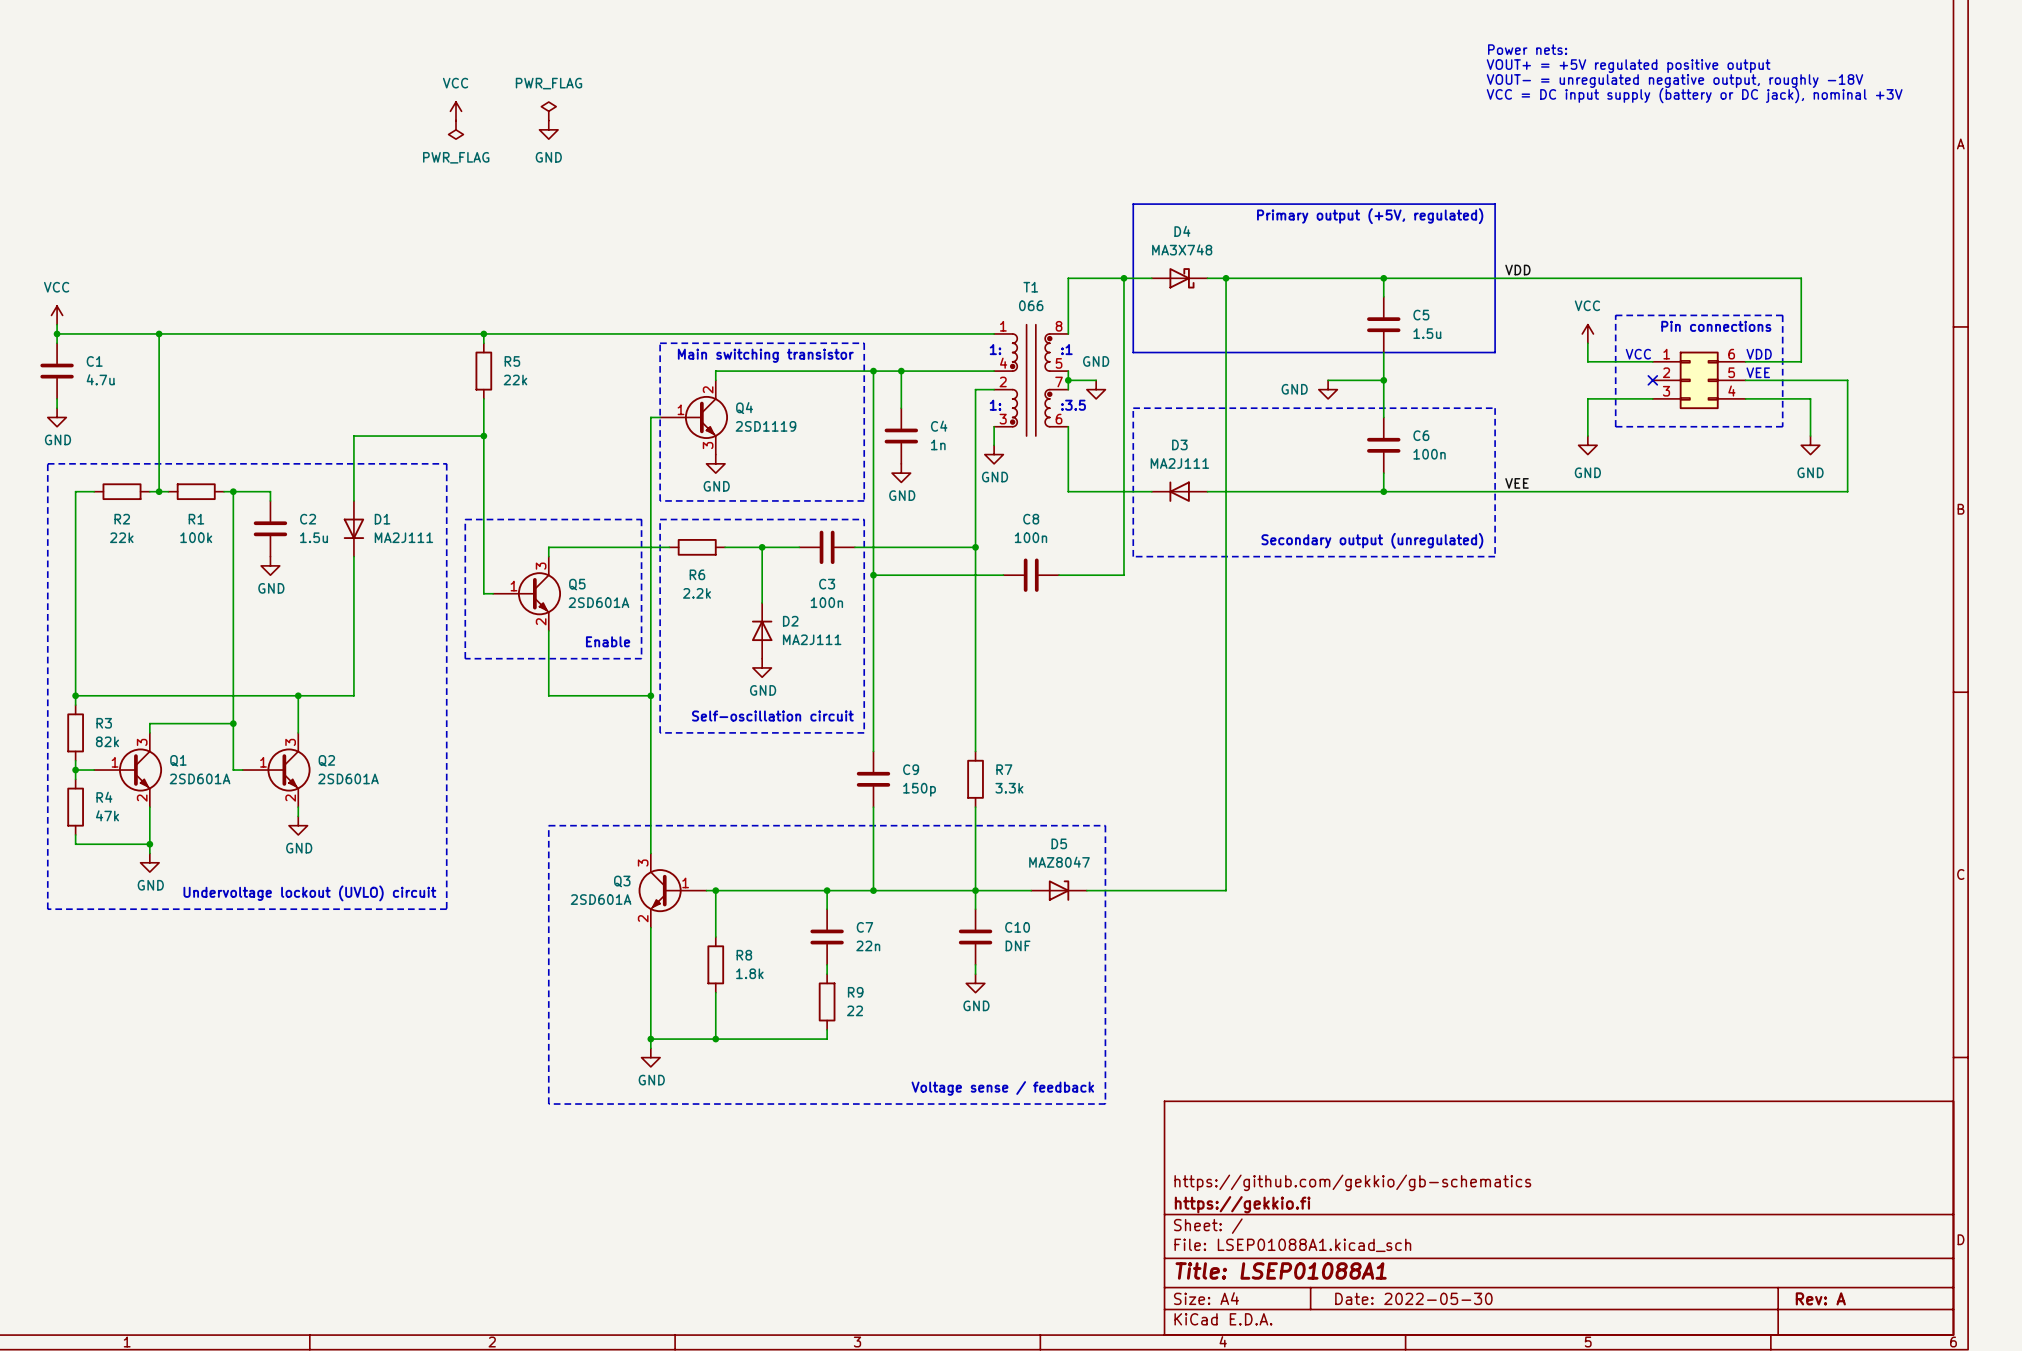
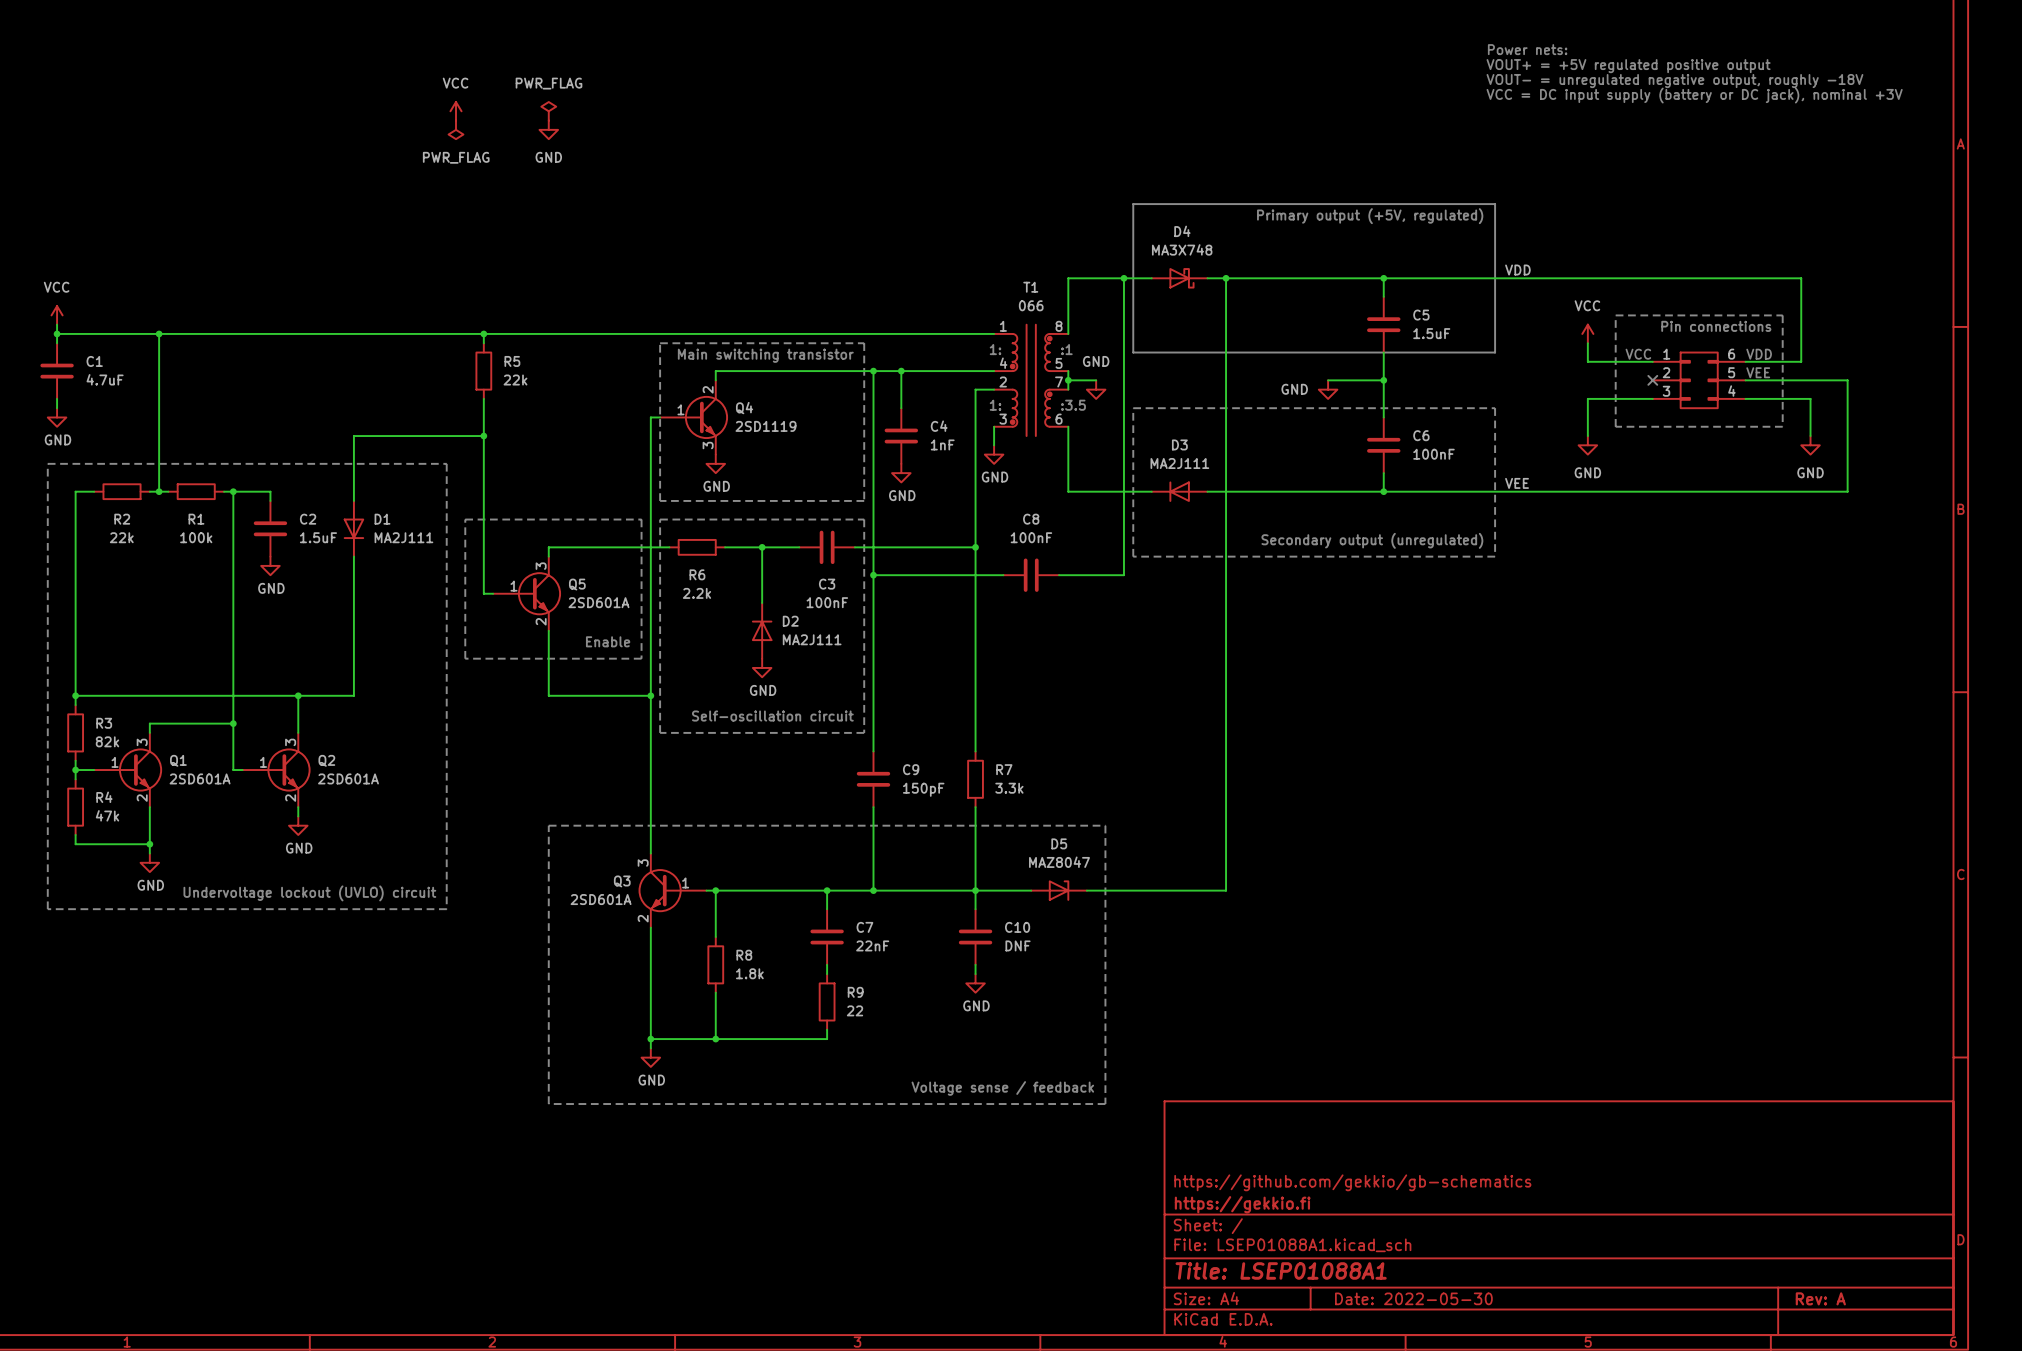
C5 value: 1.5u (1427, 333) -> 1.5uF (1431, 333)
C1 value: 4.7u (100, 379) -> 4.7uF (105, 379)
C4 value: 1n (938, 444) -> 1nF (942, 444)
C6 value: 100n (1429, 454) -> 100nF (1433, 454)
C2 value: 1.5u (314, 537) -> 1.5uF (318, 537)
C8 value: 100n (1030, 537) -> 100nF (1031, 537)
C3 value: 100n (826, 602) -> 100nF (827, 602)
C9 value: 150p (919, 789) -> 150pF (923, 789)
C7 value: 22n (868, 945) -> 22nF (872, 945)

